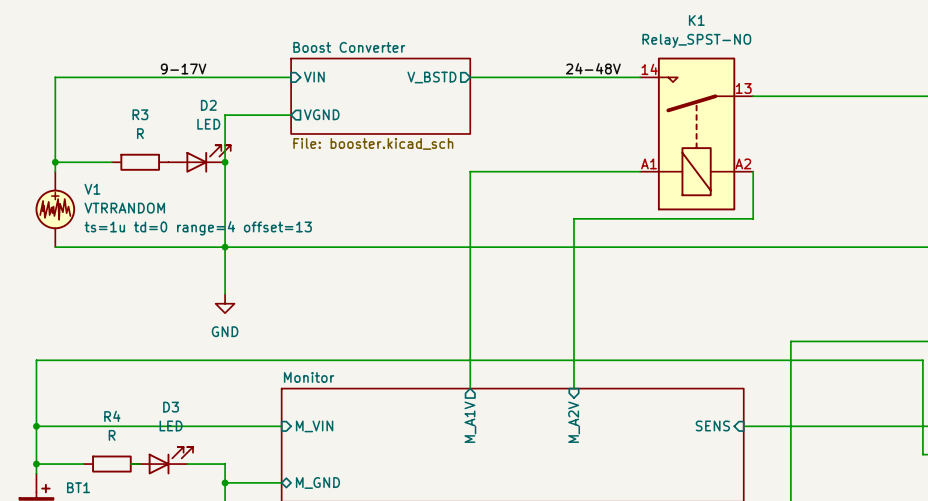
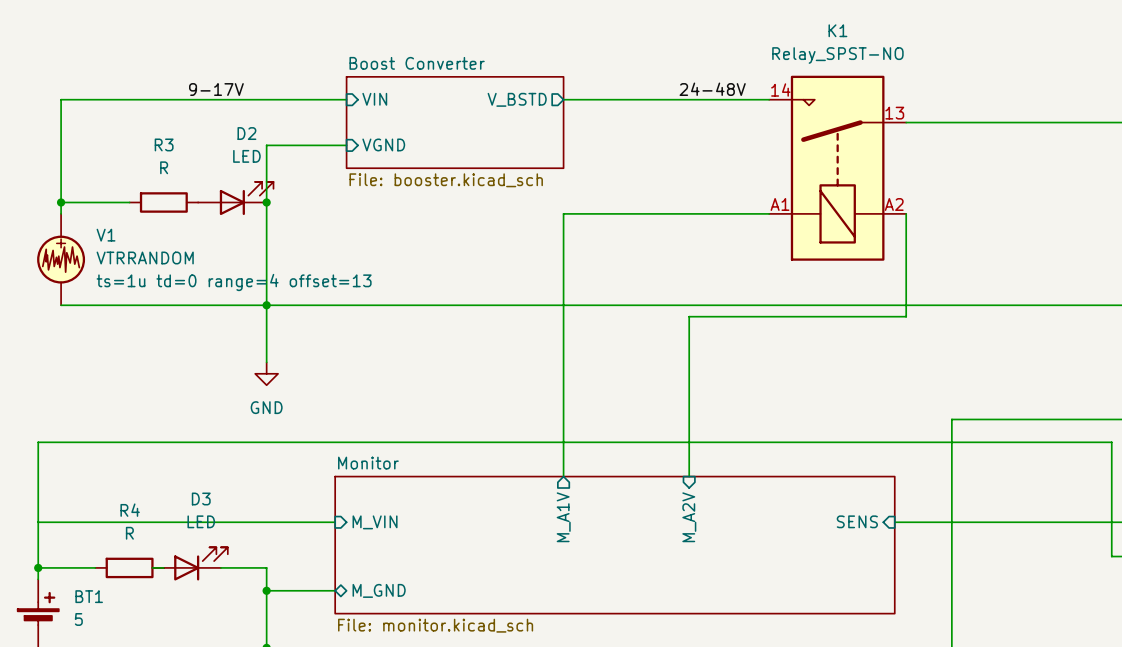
sheet pin shape: output (321, 114) -> input (383, 144)
wire: (753, 218) (573, 218) (573, 256) -> (906, 271) (906, 316) (689, 316)
junction: (36, 426) -> none

